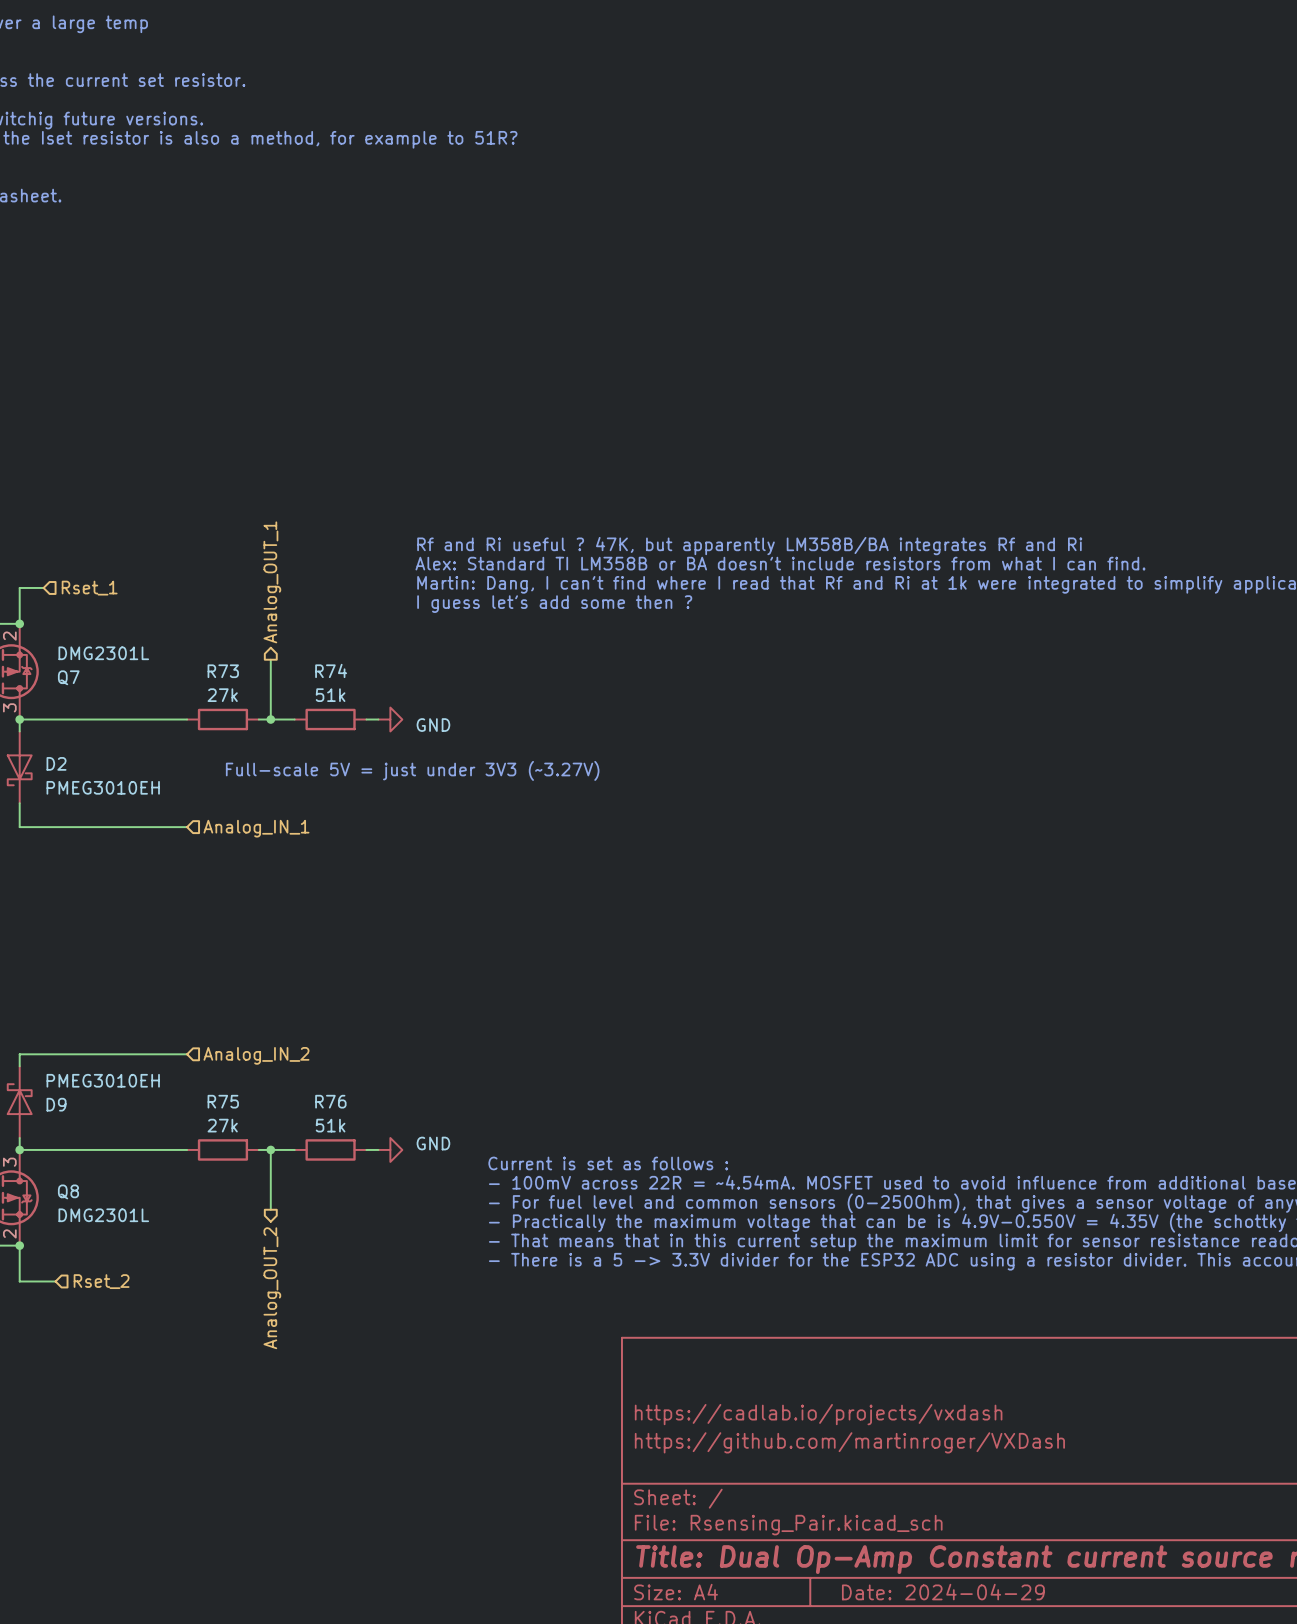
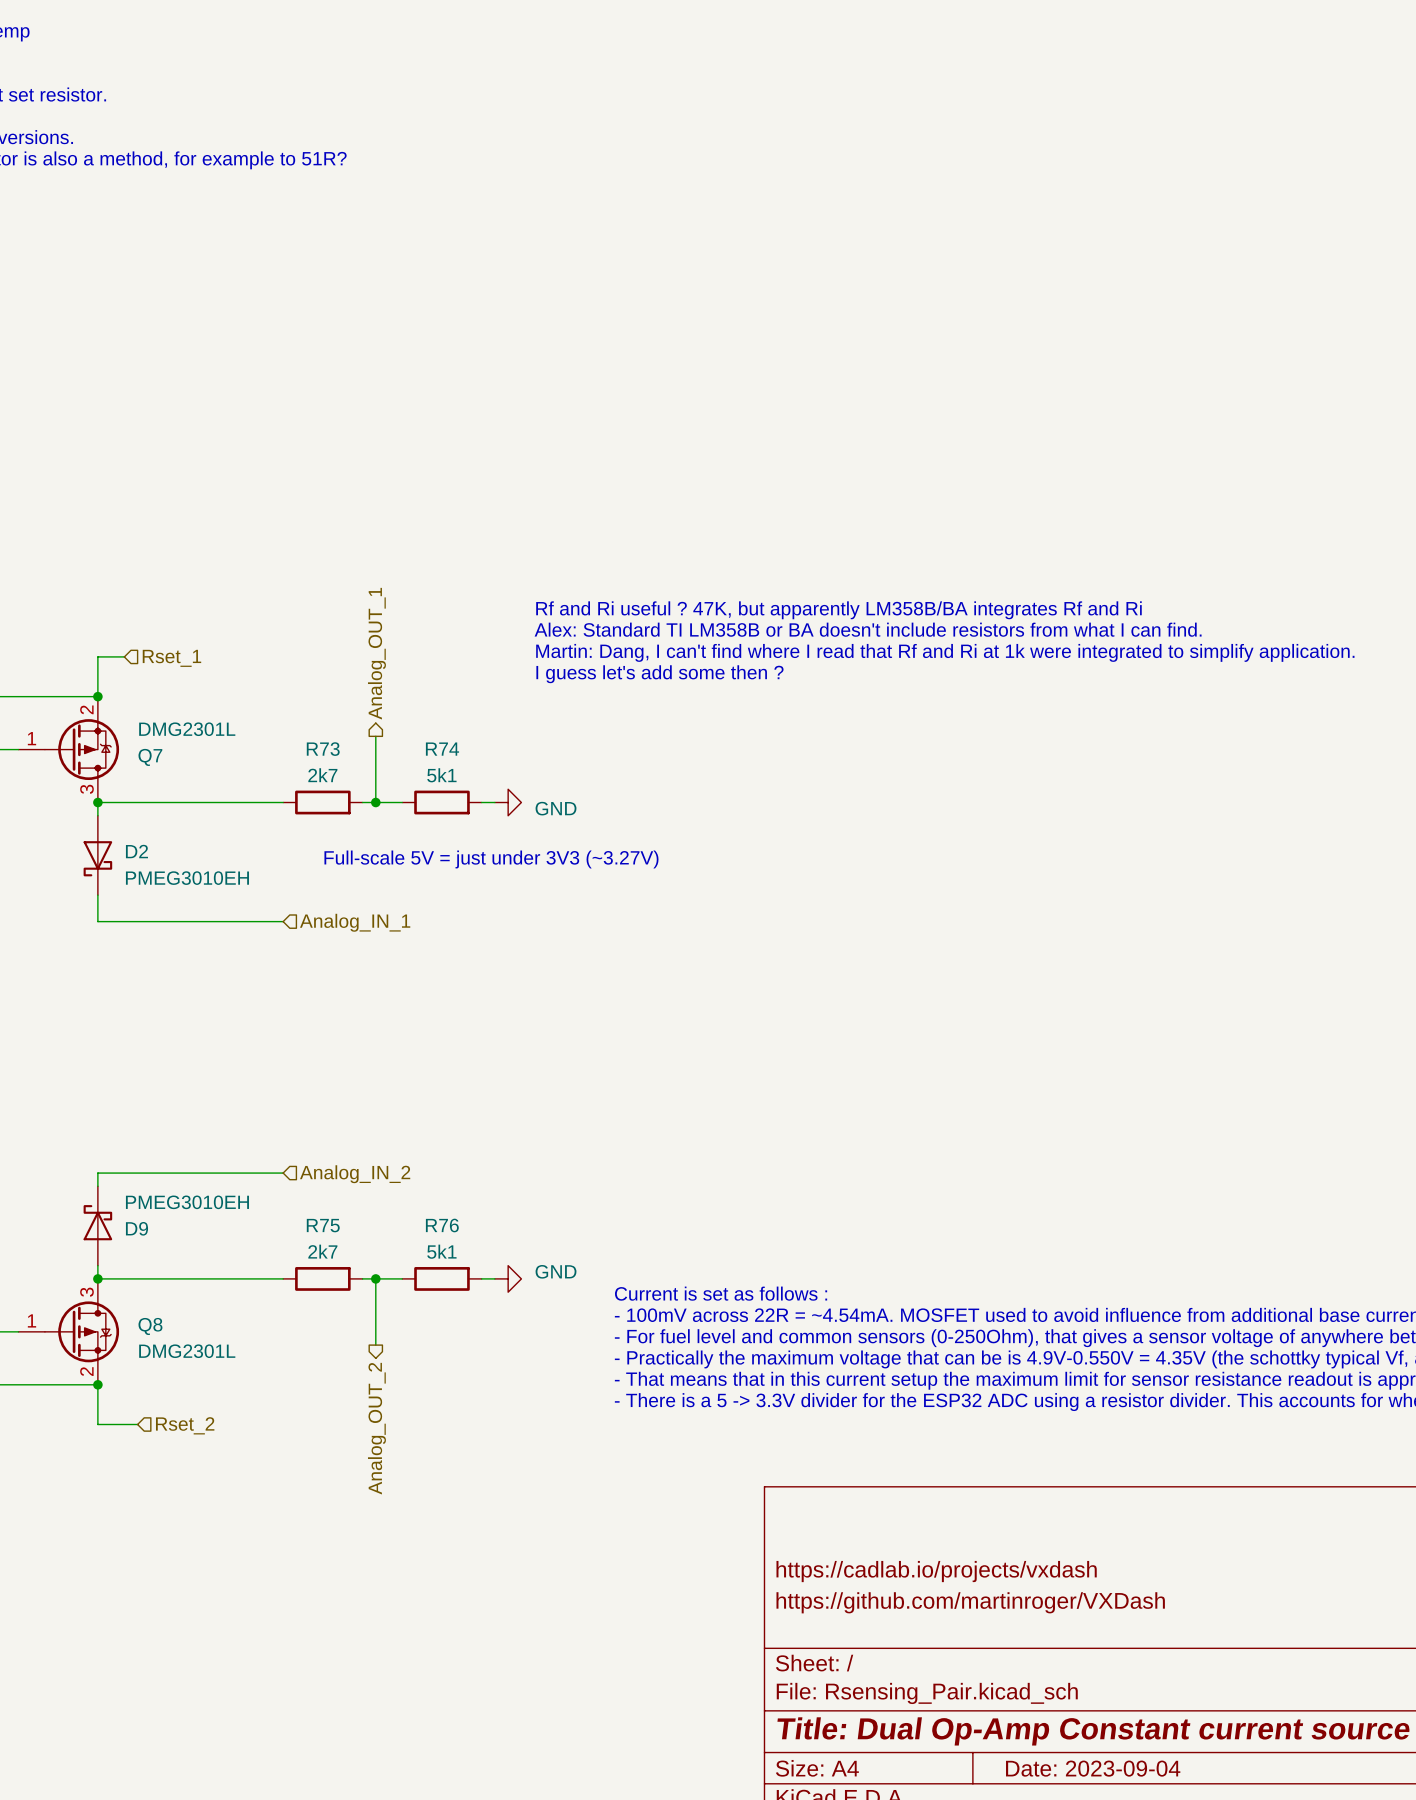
R73 value: 27k (222, 695) -> 2k7 (322, 775)
R74 value: 51k (330, 695) -> 5k1 (441, 775)
R75 value: 27k (222, 1125) -> 2k7 (322, 1251)
R76 value: 51k (330, 1125) -> 5k1 (441, 1251)
title block: Date: 2024-04-29 (943, 1592) -> Date: 2023-09-04 (1093, 1768)

